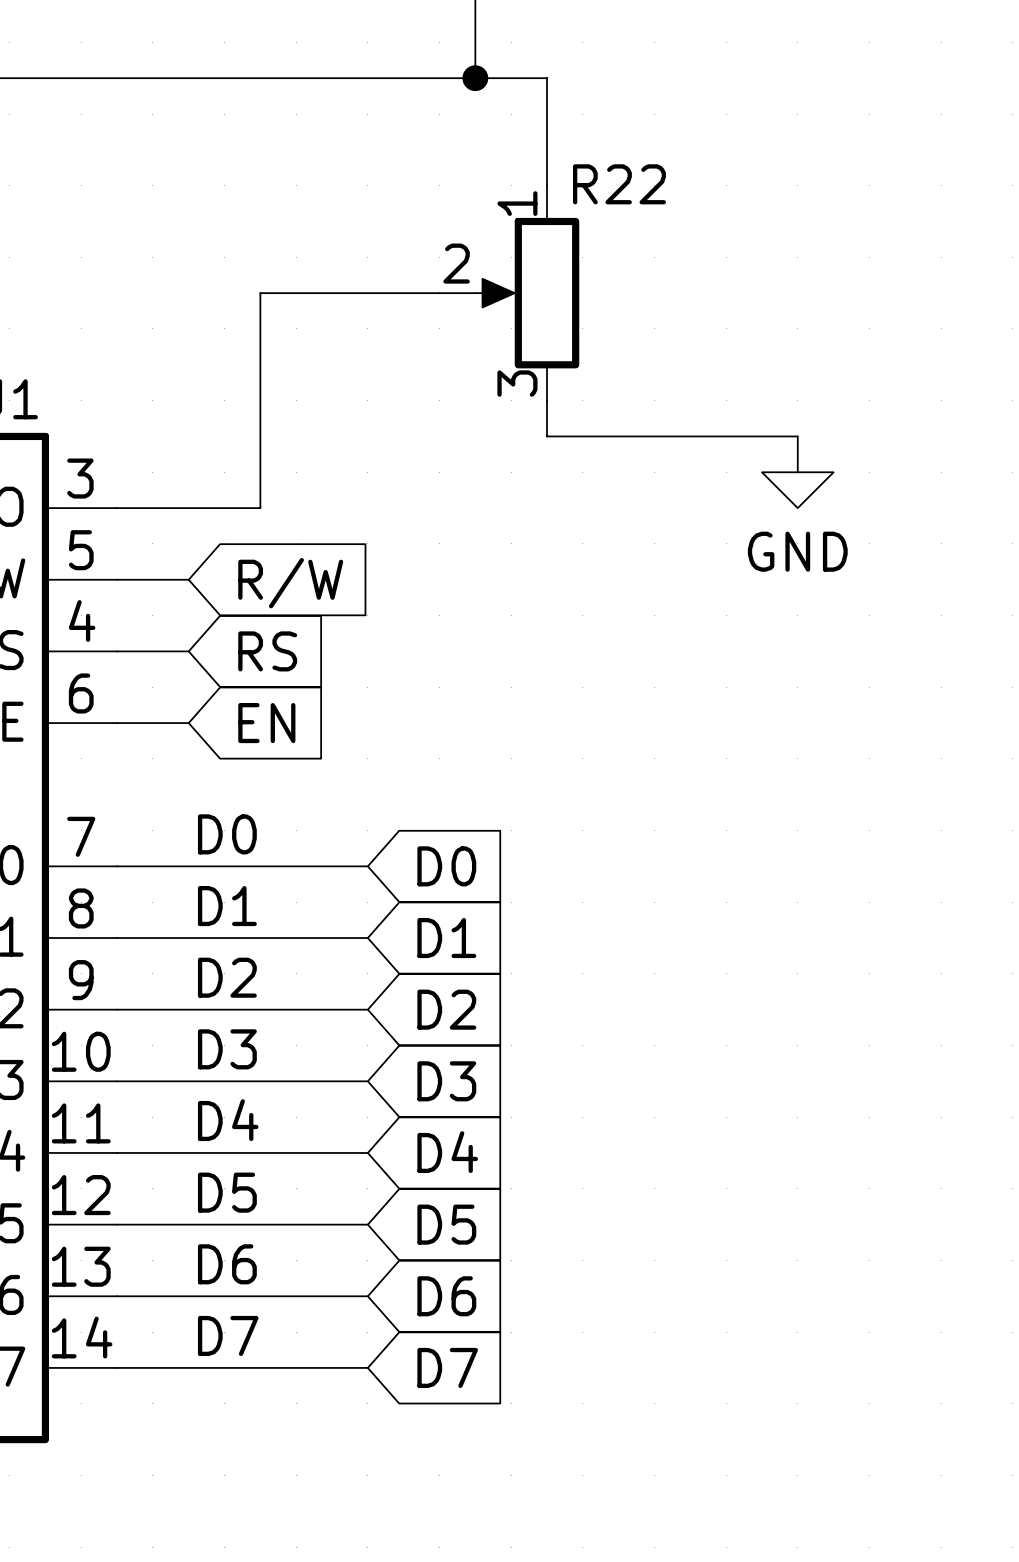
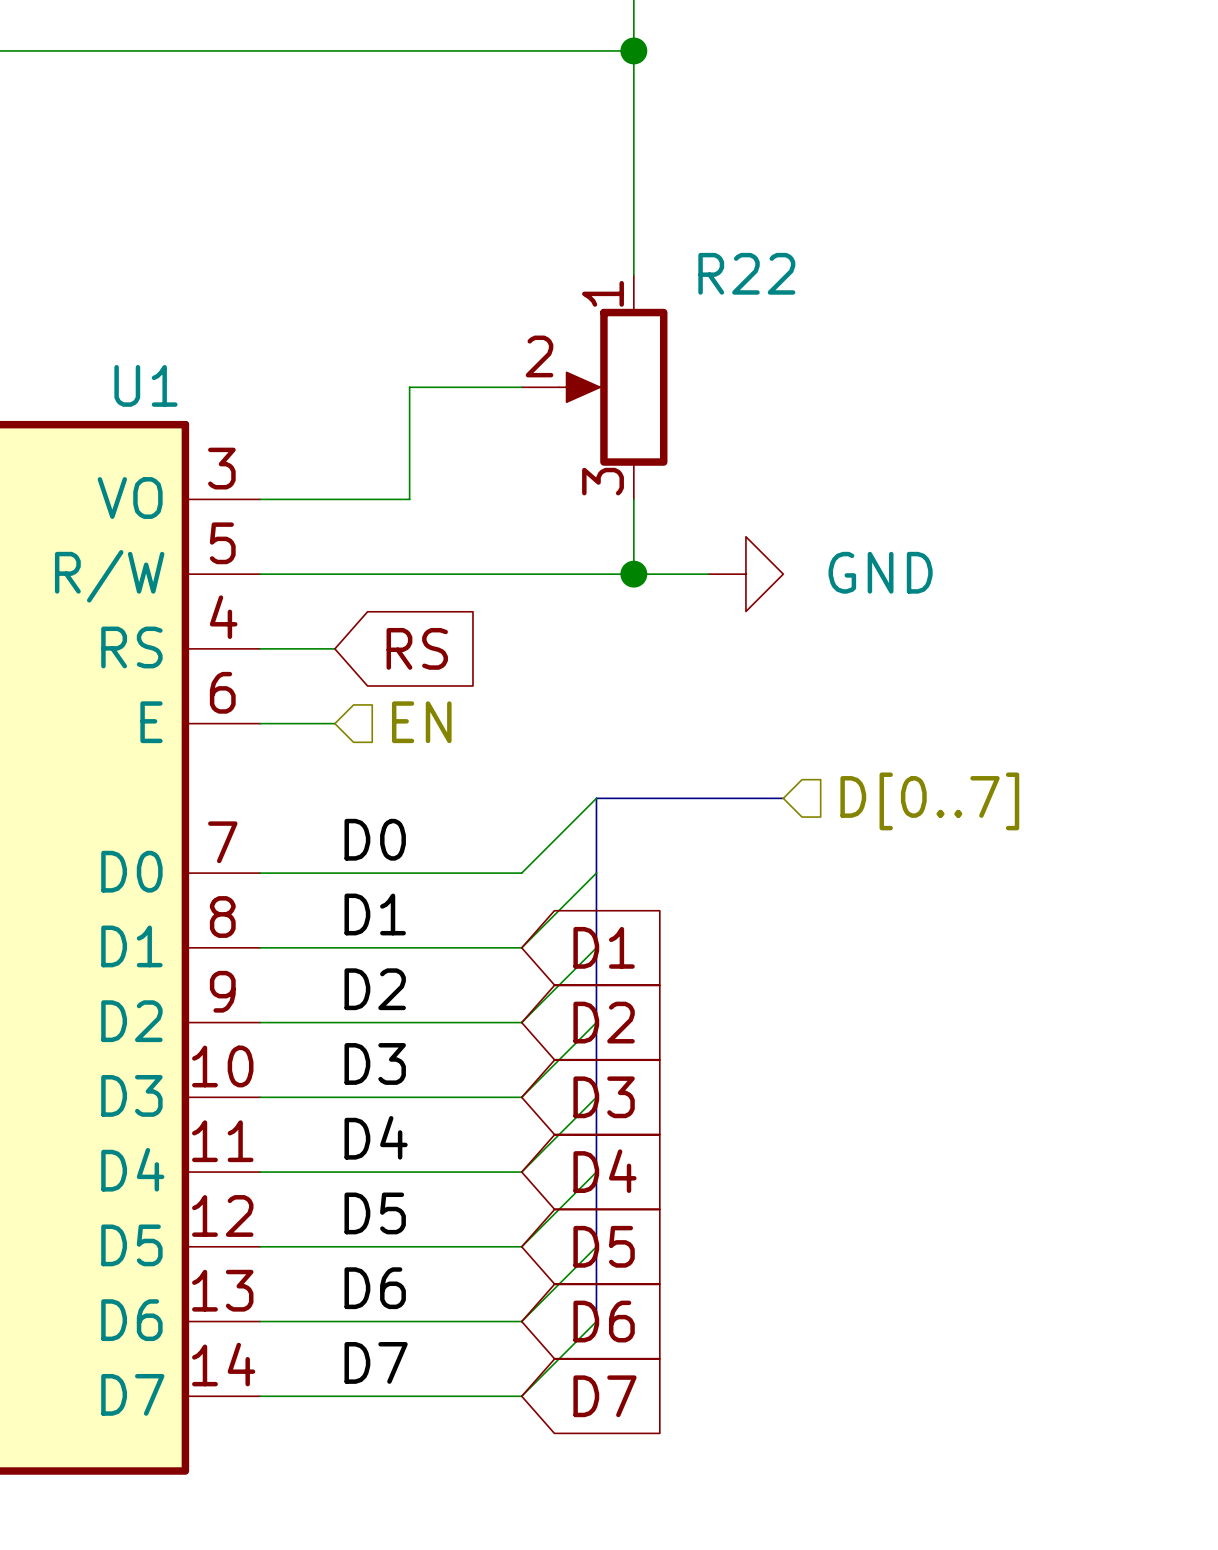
wire: (475, 78) (546, 78) (546, 185) -> (633, 50) (633, 275)
R22 name position: R22 (619, 184) -> R22 (746, 273)
wire: (439, 293) (260, 293) (260, 400) -> (521, 387) (409, 387)
R22 position: (509, 293) -> (594, 387)
wire: (546, 400) (546, 436) (797, 436) -> none
power symbol rotation: 0° (797, 472) -> 90° counterclockwise (745, 574)
power symbol position: GND (797, 472) -> GND (745, 574)
wire: none -> (633, 499) (633, 574)
power symbol text position: GND (797, 551) -> GND (880, 572)
wire: none -> (334, 574) (708, 574)
junction: none -> (633, 574)
global label: R/W (290, 583) -> none
hierarchical label: none -> EN (421, 722)
global label: EN (266, 723) -> none
wire: none -> (596, 798) (521, 873)
bus: none -> (783, 798) (596, 798) (596, 1321)
hierarchical label: none -> D[0..7] (929, 801)
wire: none -> (596, 873) (521, 947)
global label: D0 (446, 866) -> none
wire: none -> (596, 947) (521, 1022)
wire: none -> (596, 1022) (521, 1097)
wire: none -> (596, 1097) (521, 1172)
wire: none -> (596, 1172) (521, 1246)
wire: none -> (596, 1246) (521, 1321)
wire: none -> (596, 1321) (521, 1396)

